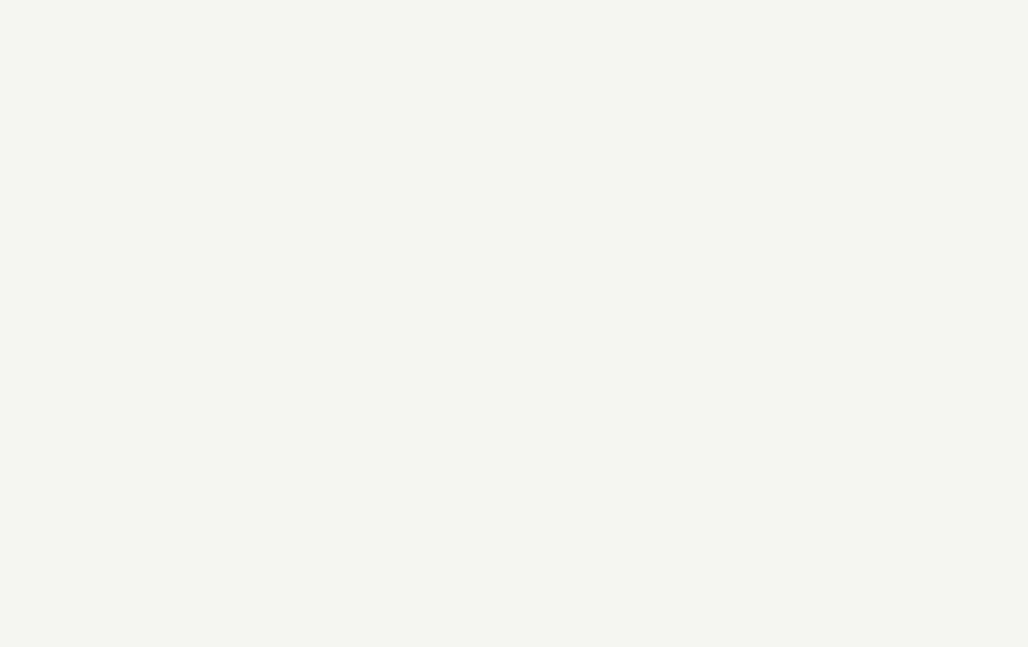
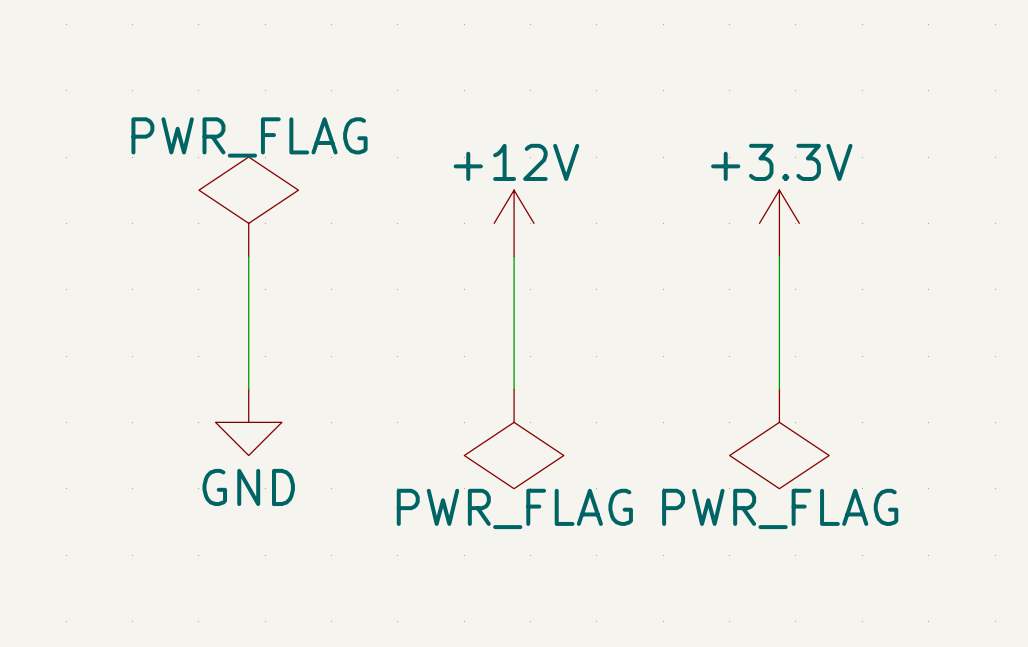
power symbol: none -> PWR_FLAG (248, 206)
power symbol: none -> +12V (514, 223)
power symbol: none -> +3.3V (779, 223)
wire: none -> (248, 256) (248, 389)
wire: none -> (514, 256) (514, 389)
wire: none -> (779, 256) (779, 389)
power symbol: none -> GND (248, 422)
power symbol: none -> PWR_FLAG (514, 438)
power symbol: none -> PWR_FLAG (779, 438)

